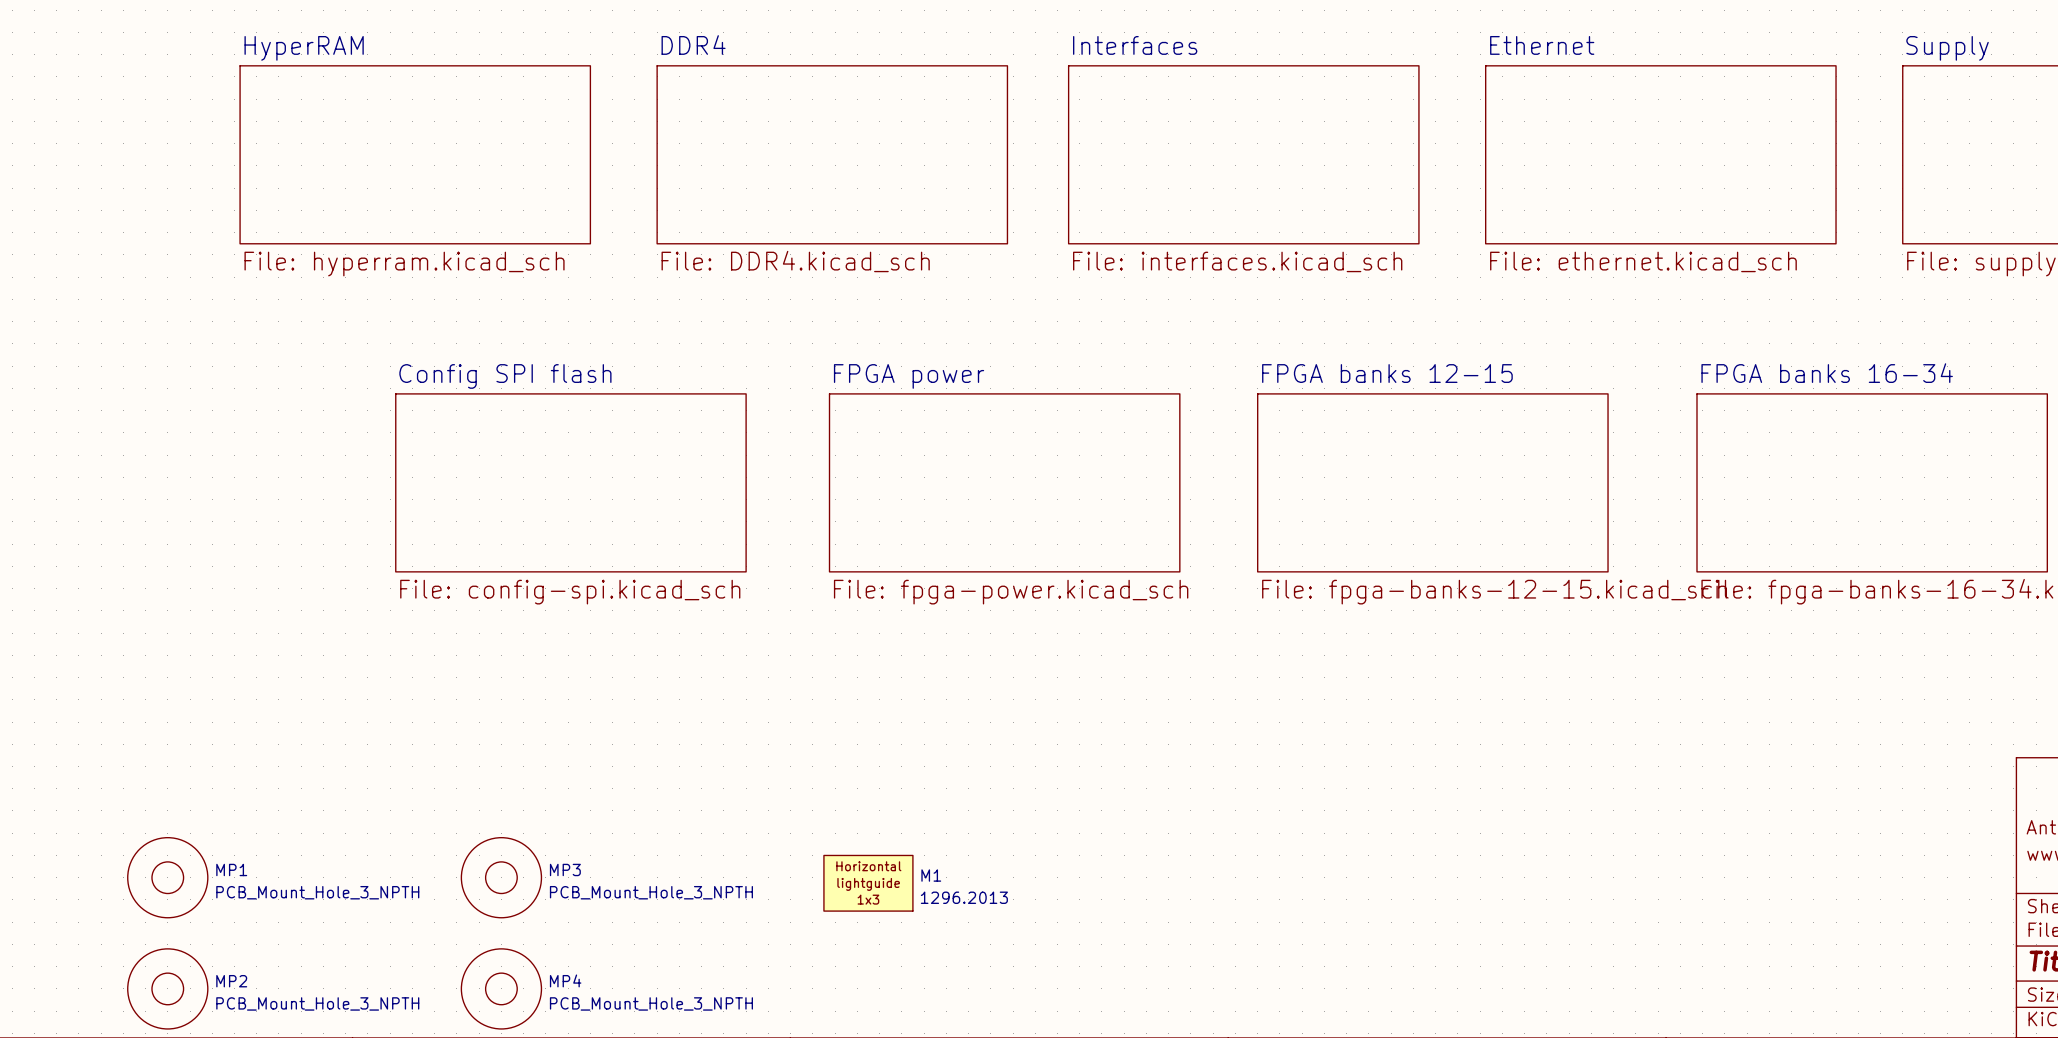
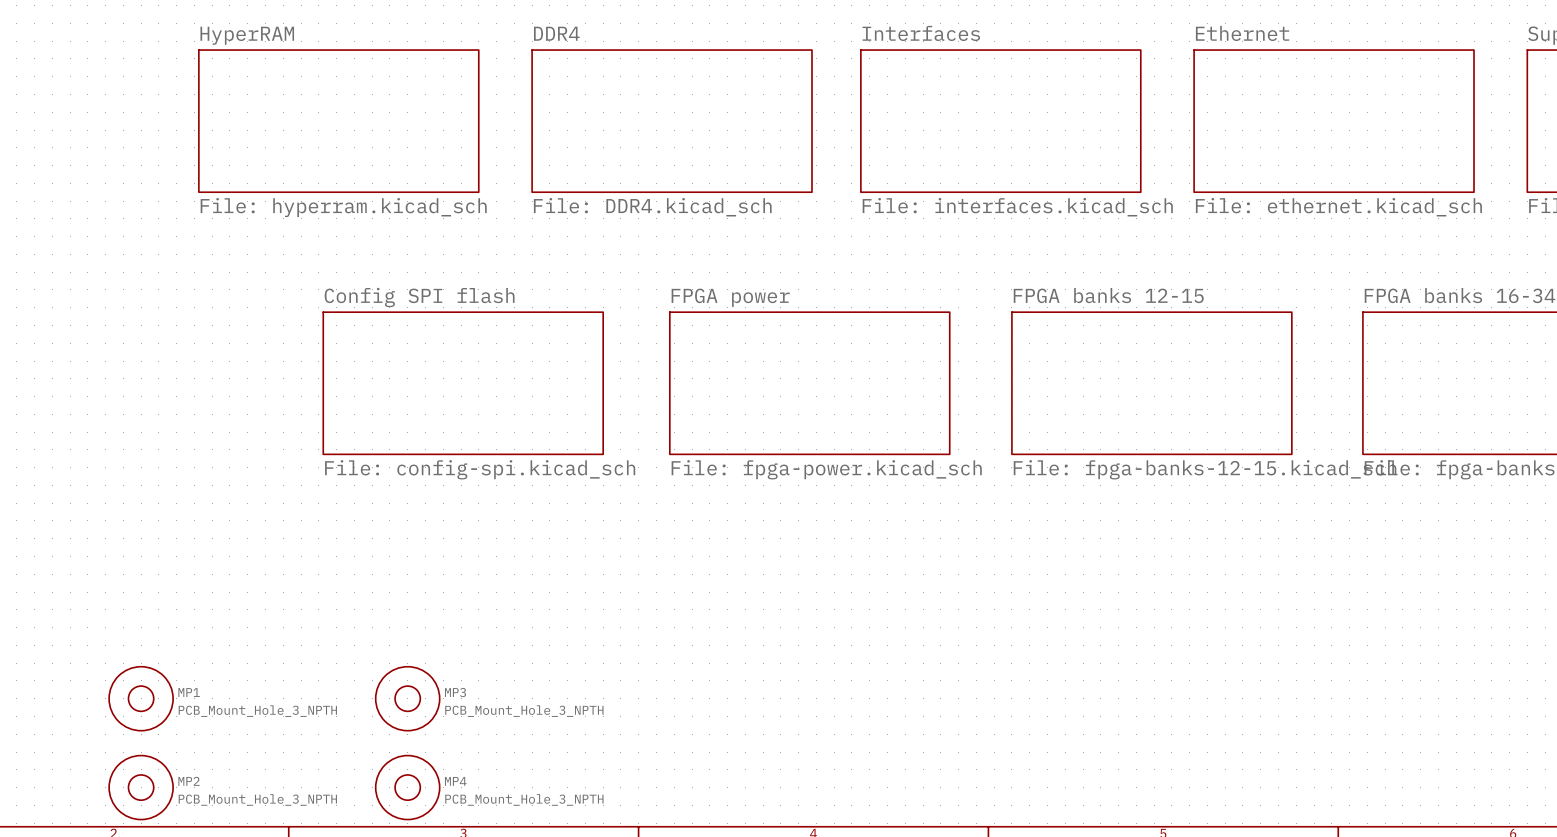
M1: 1296.2013 (868, 883) -> none

